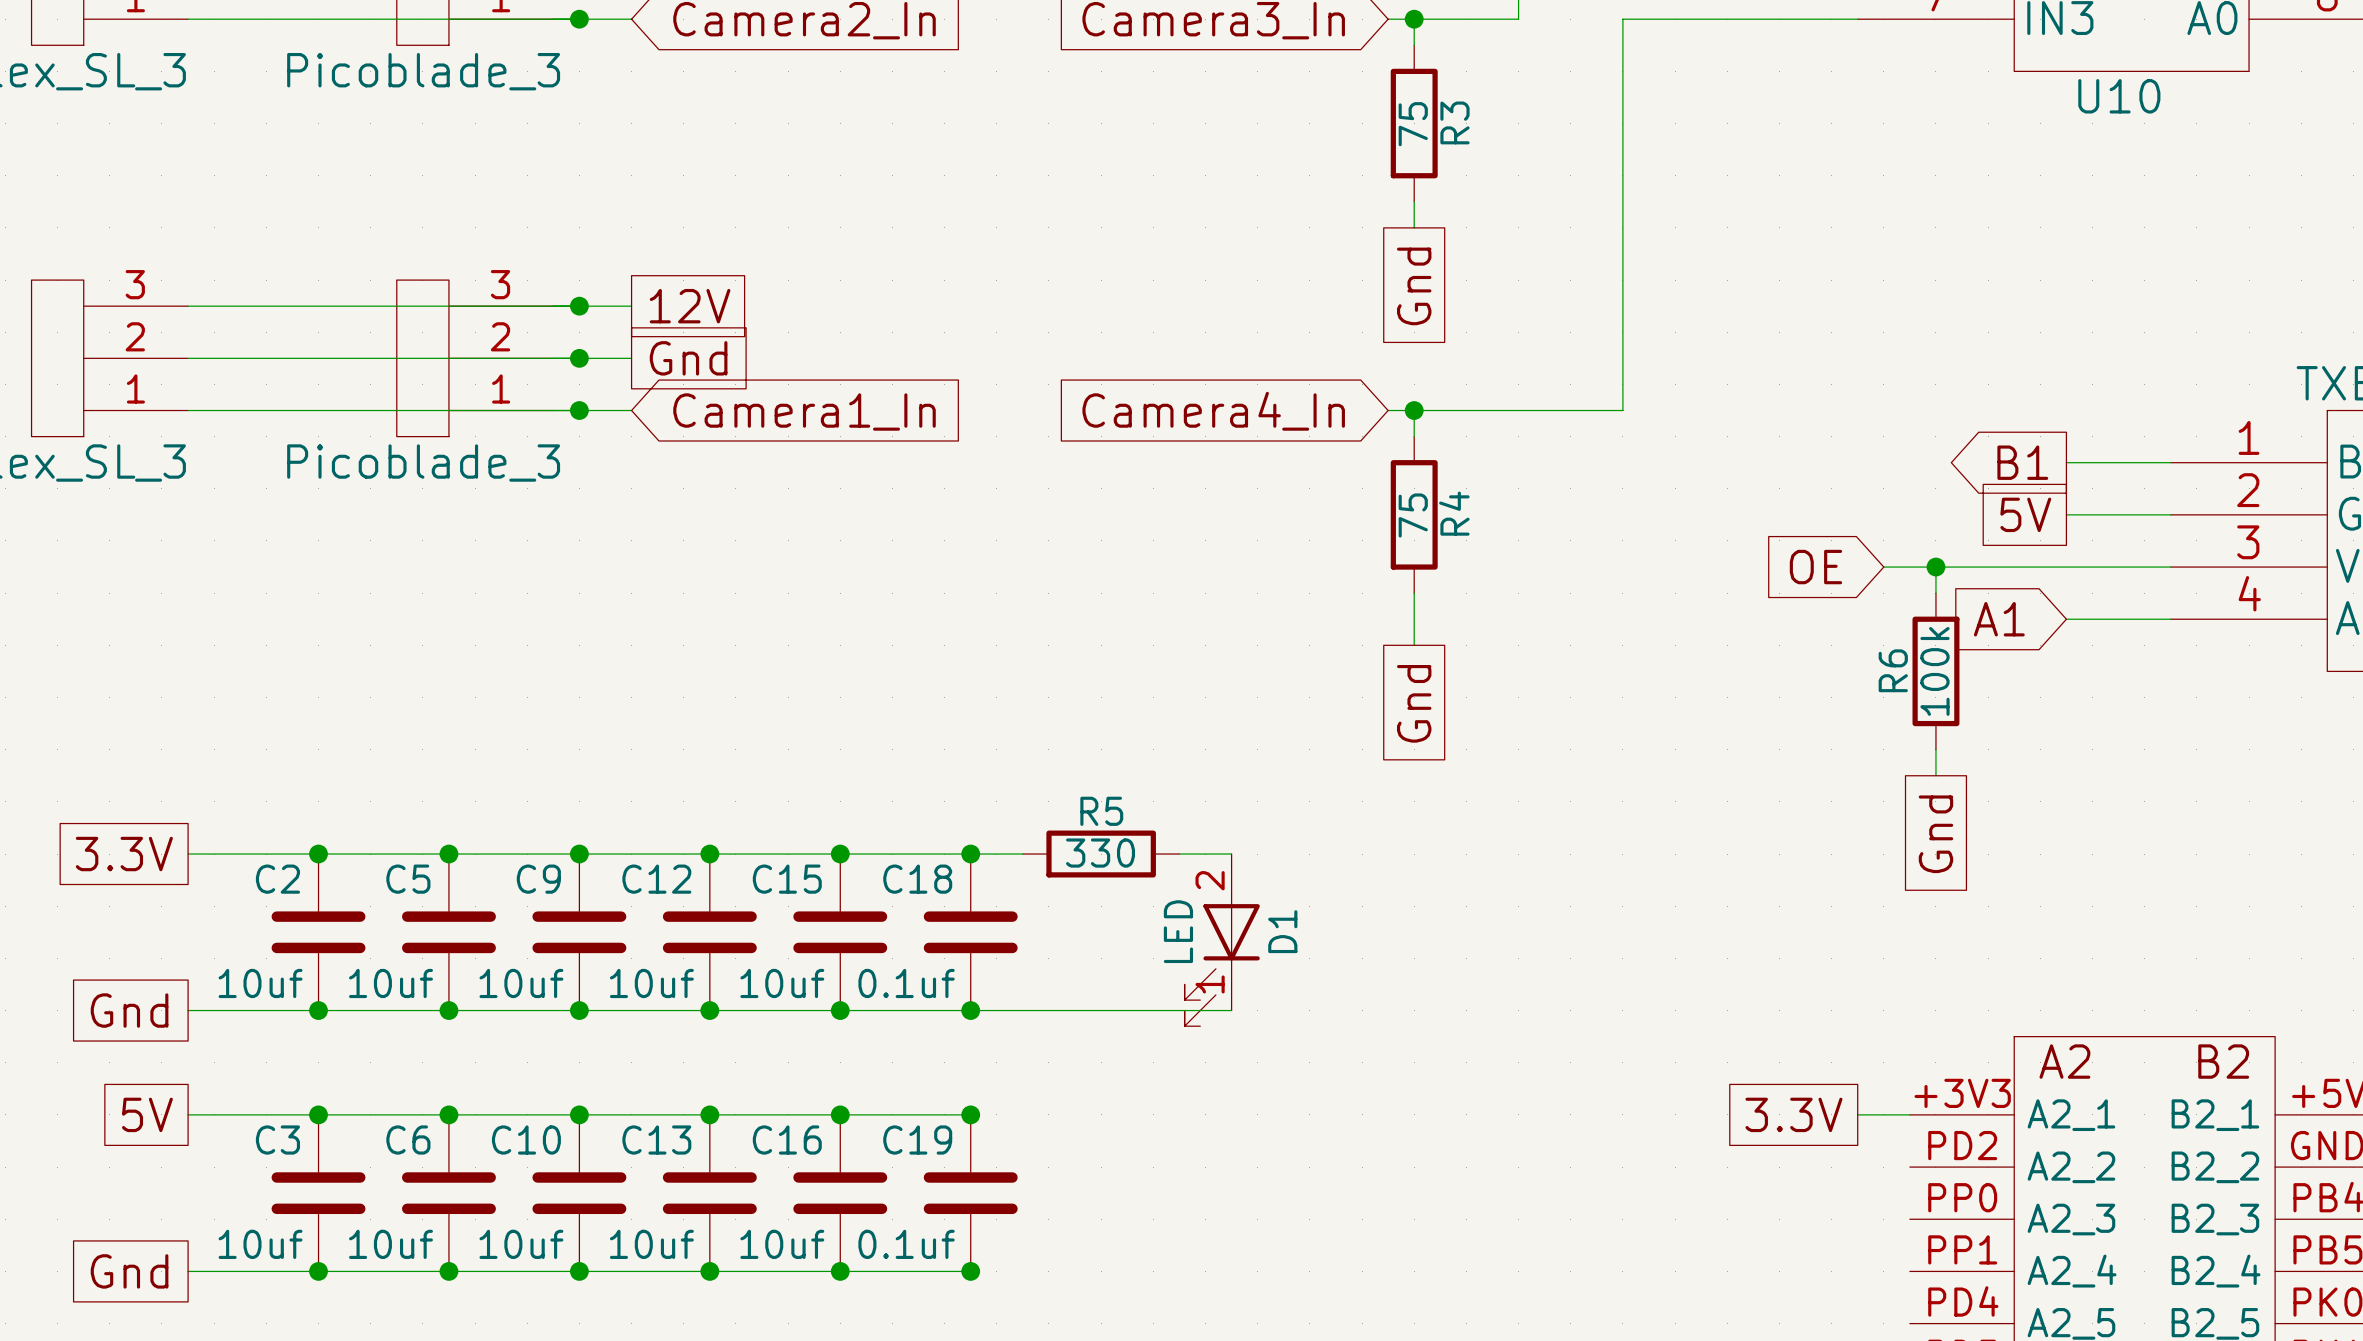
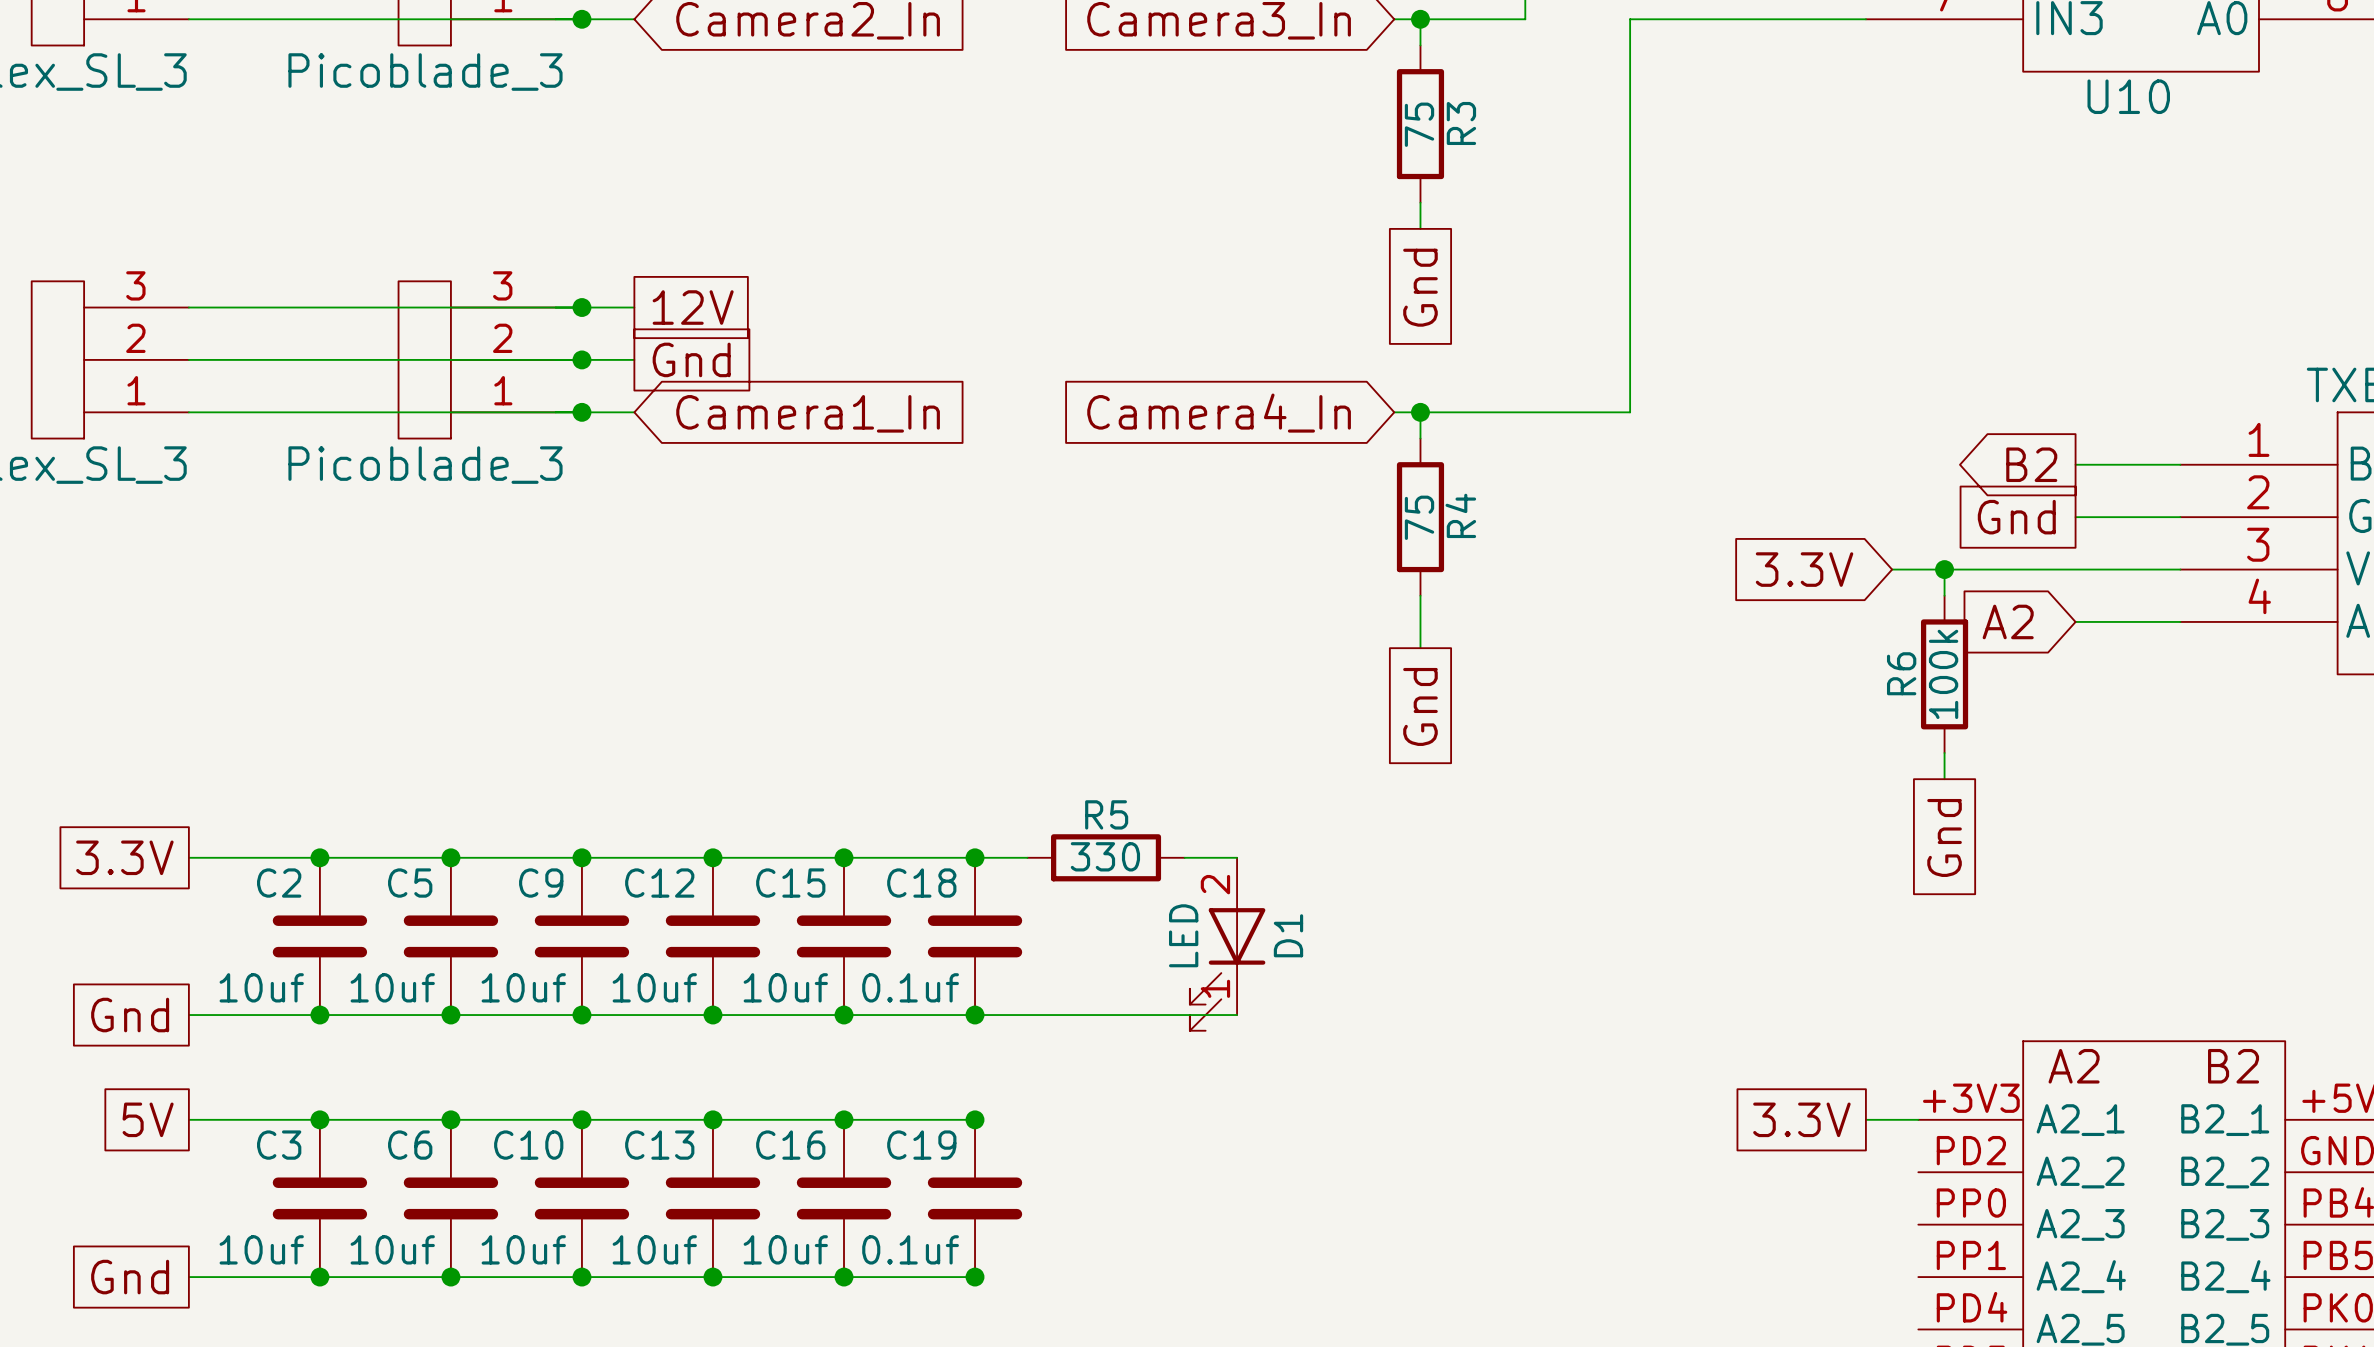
global label: B1 (2022, 462) -> B2 (2031, 464)
global label: 5V (2025, 514) -> Gnd (2016, 517)
global label: OE (1815, 567) -> 3.3V (1804, 569)
global label: A1 (1999, 619) -> A2 (2008, 621)

